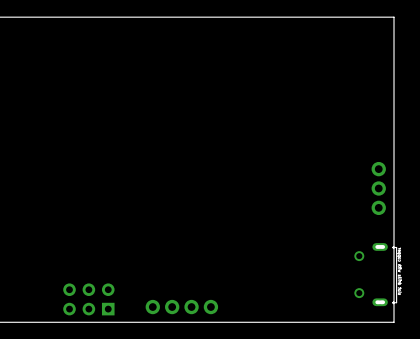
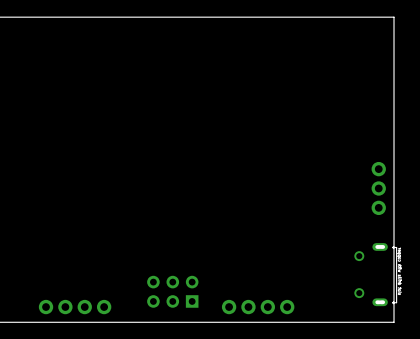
part position: (88, 299) -> (172, 291)
part: none -> (75, 307)
part: (181, 307) -> none
part: none -> (258, 307)

